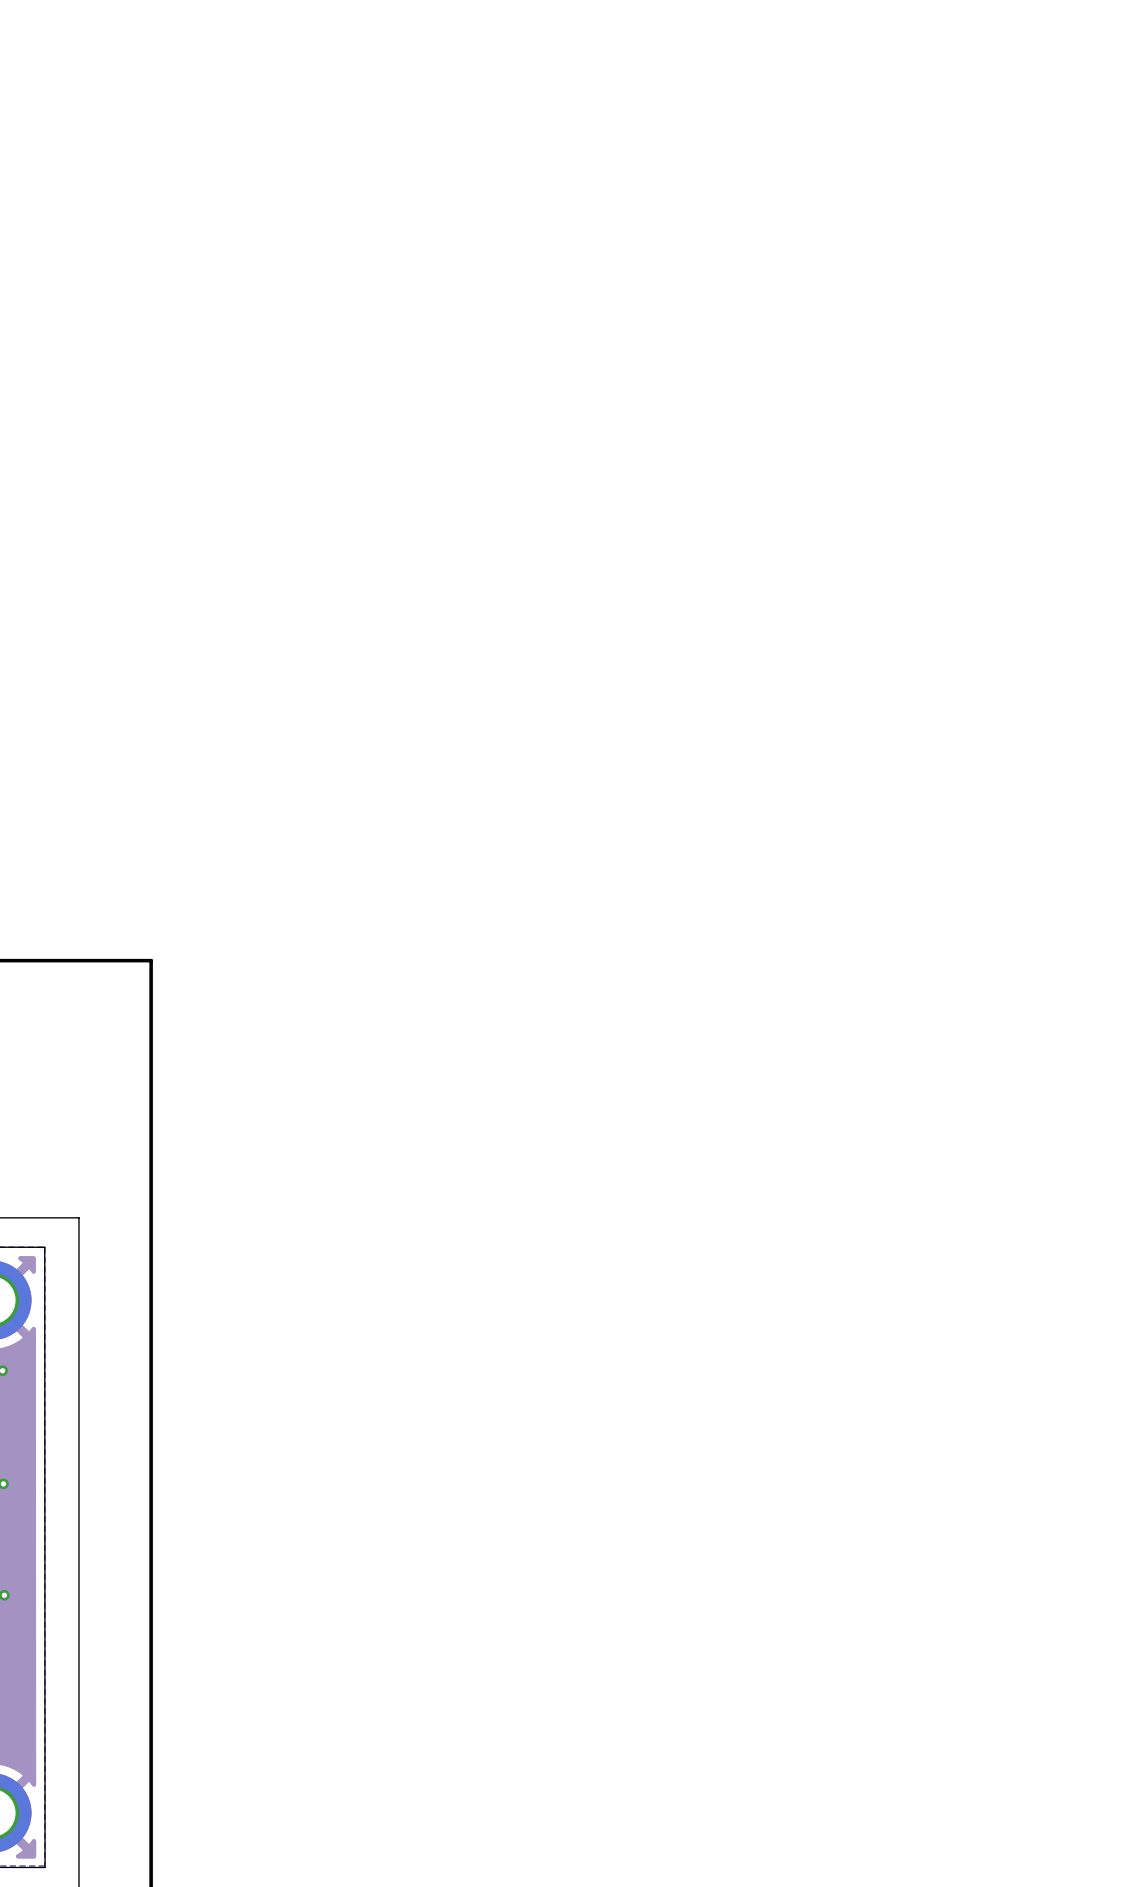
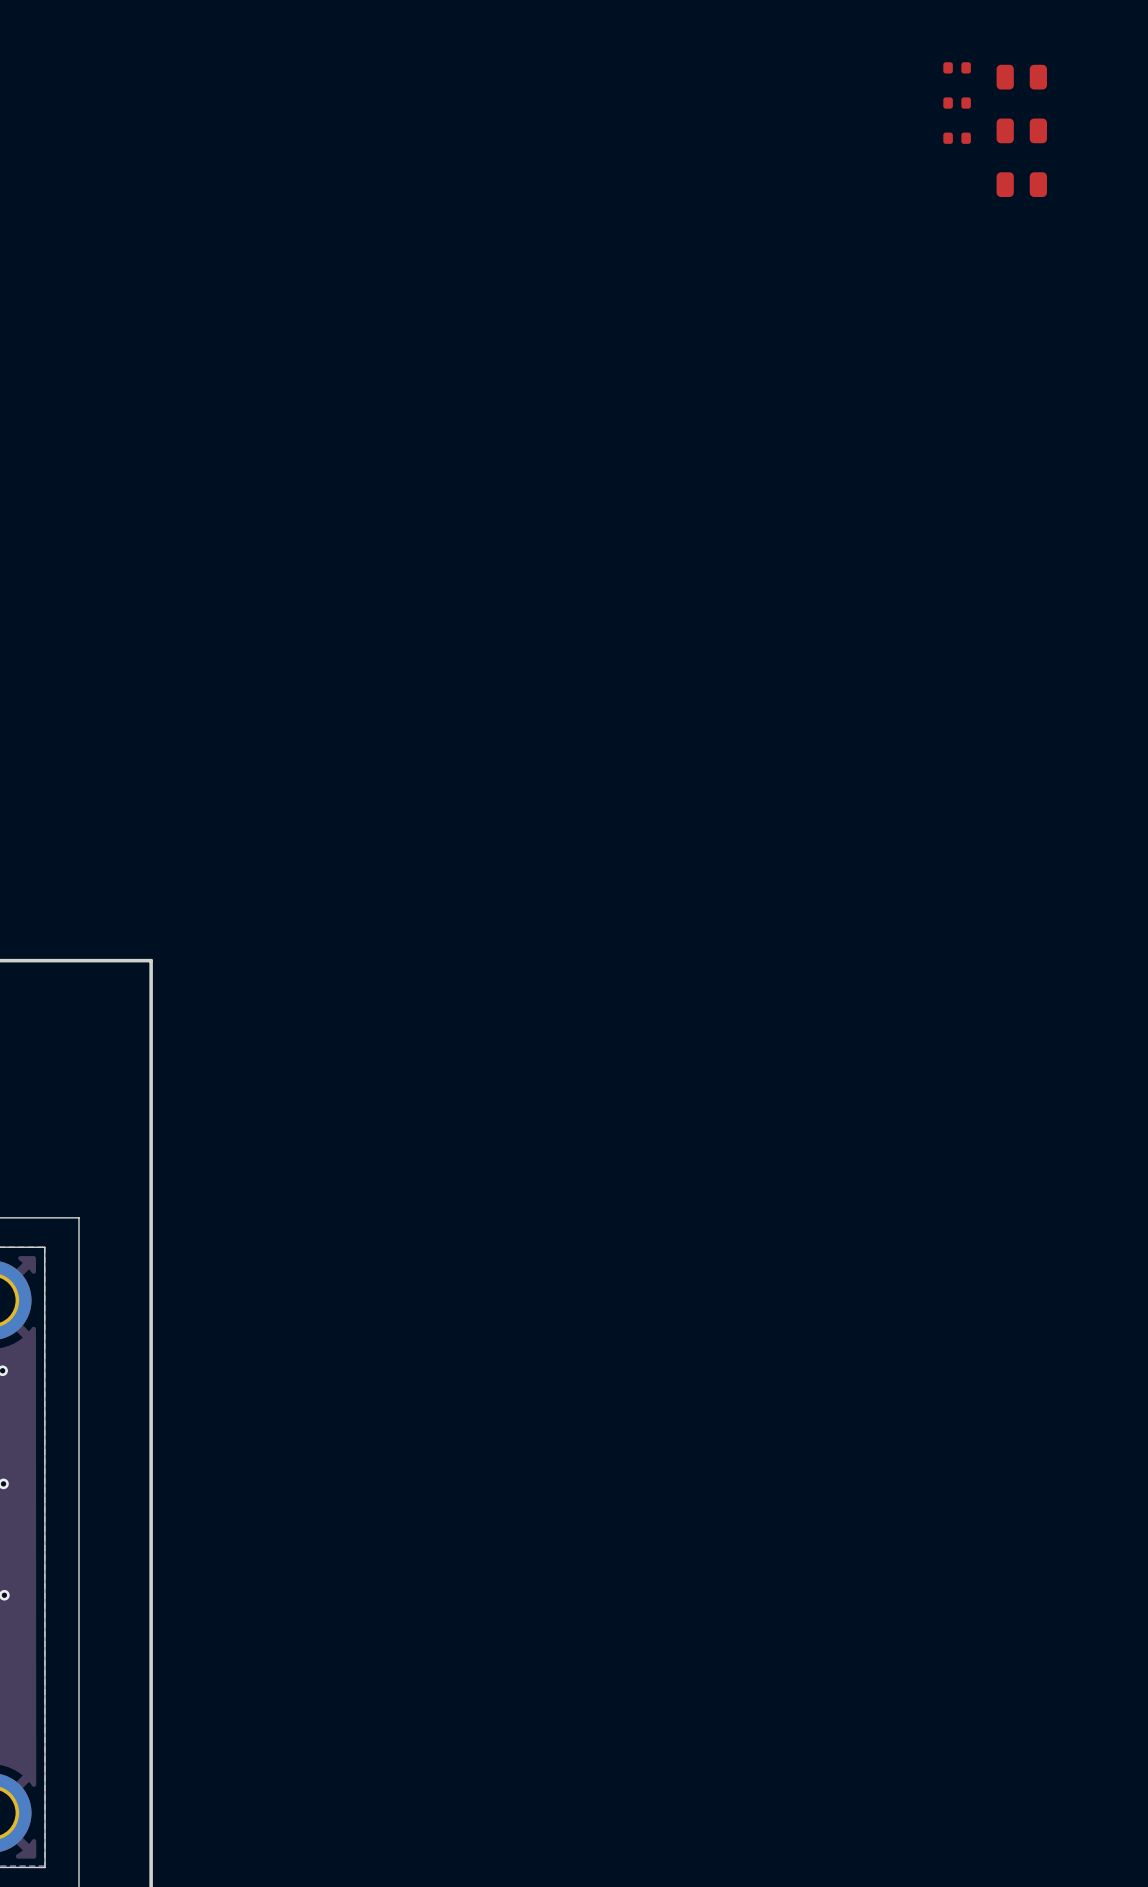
part: none -> (957, 67)
part: none -> (1021, 77)
part: none -> (957, 103)
part: none -> (1021, 130)
part: none -> (957, 138)
part: none -> (1021, 184)

